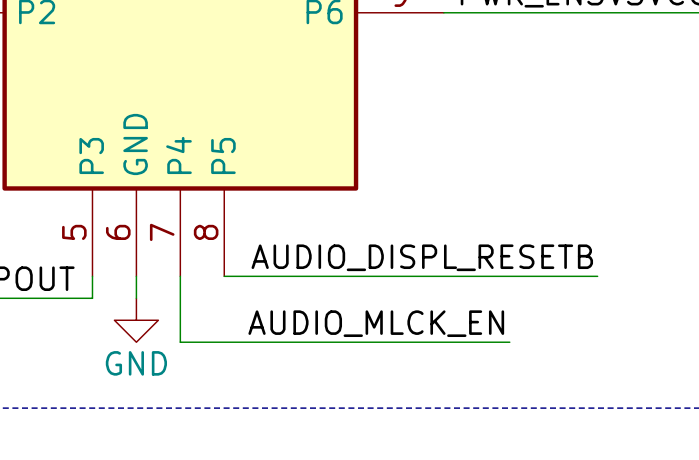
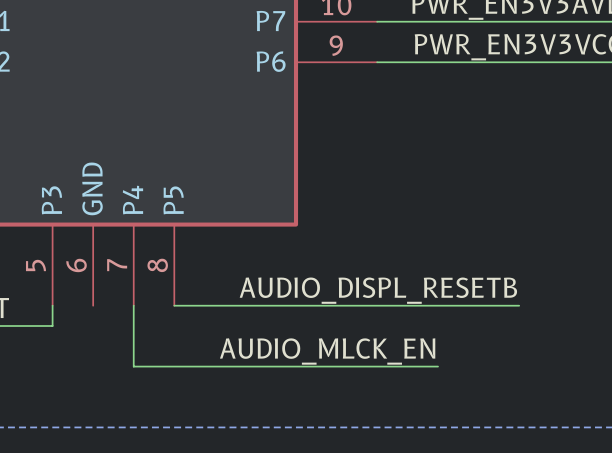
wire: (136, 276) (136, 298) -> none
power symbol: GND (136, 320) -> none

